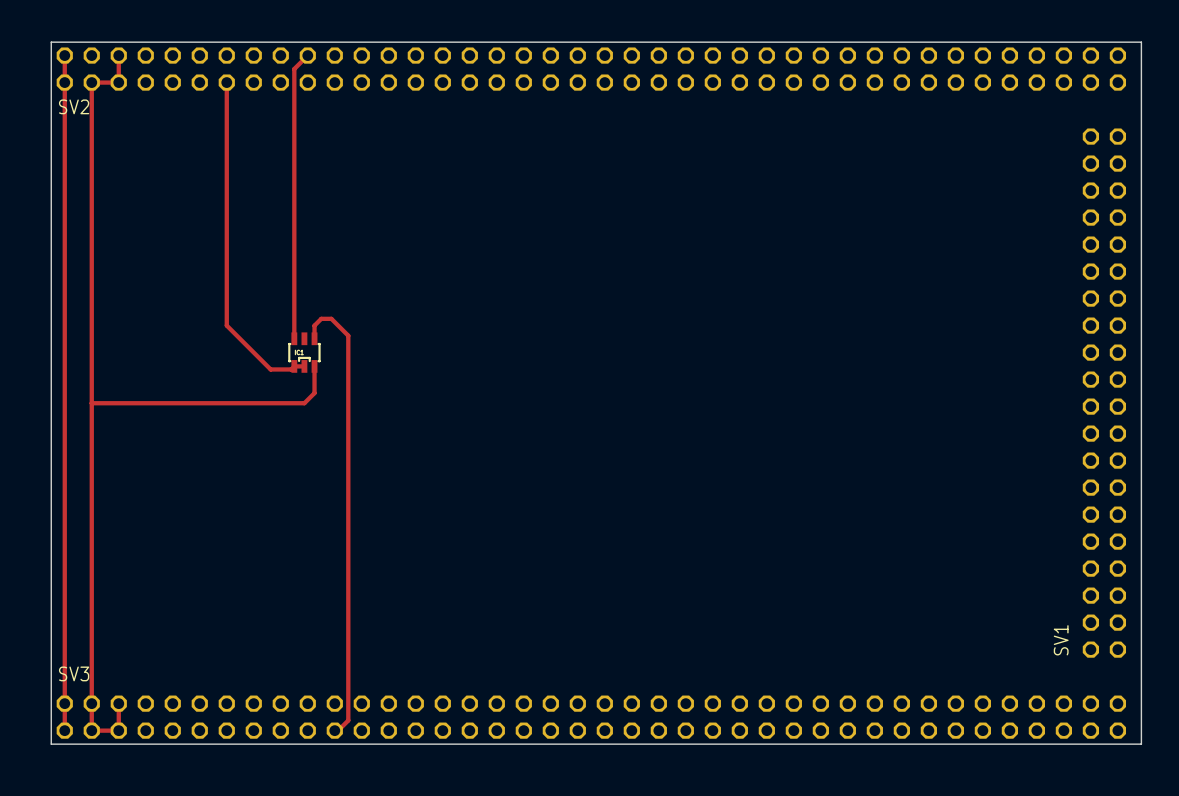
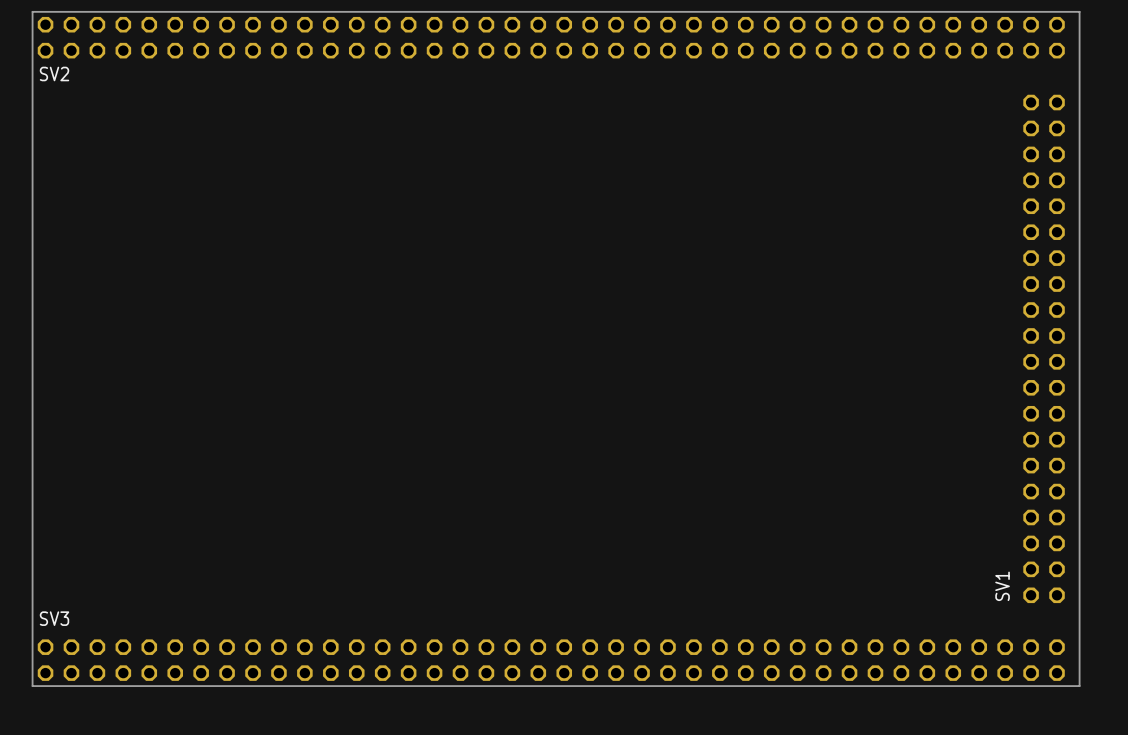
track: (64, 55) (64, 730) -> none
track: (118, 55) (118, 82) (91, 82) (91, 730) (118, 730) (118, 703) -> none
track: (307, 55) (294, 69) (294, 338) -> none
track: (226, 82) (226, 325) (270, 369) (291, 369) (294, 366) (304, 366) -> none
track: (314, 338) (314, 325) (321, 318) (331, 318) (348, 335) (348, 720) (338, 730) (334, 730) -> none
part: (304, 352) -> none
track: (314, 366) (314, 393) (304, 403) (91, 403) -> none

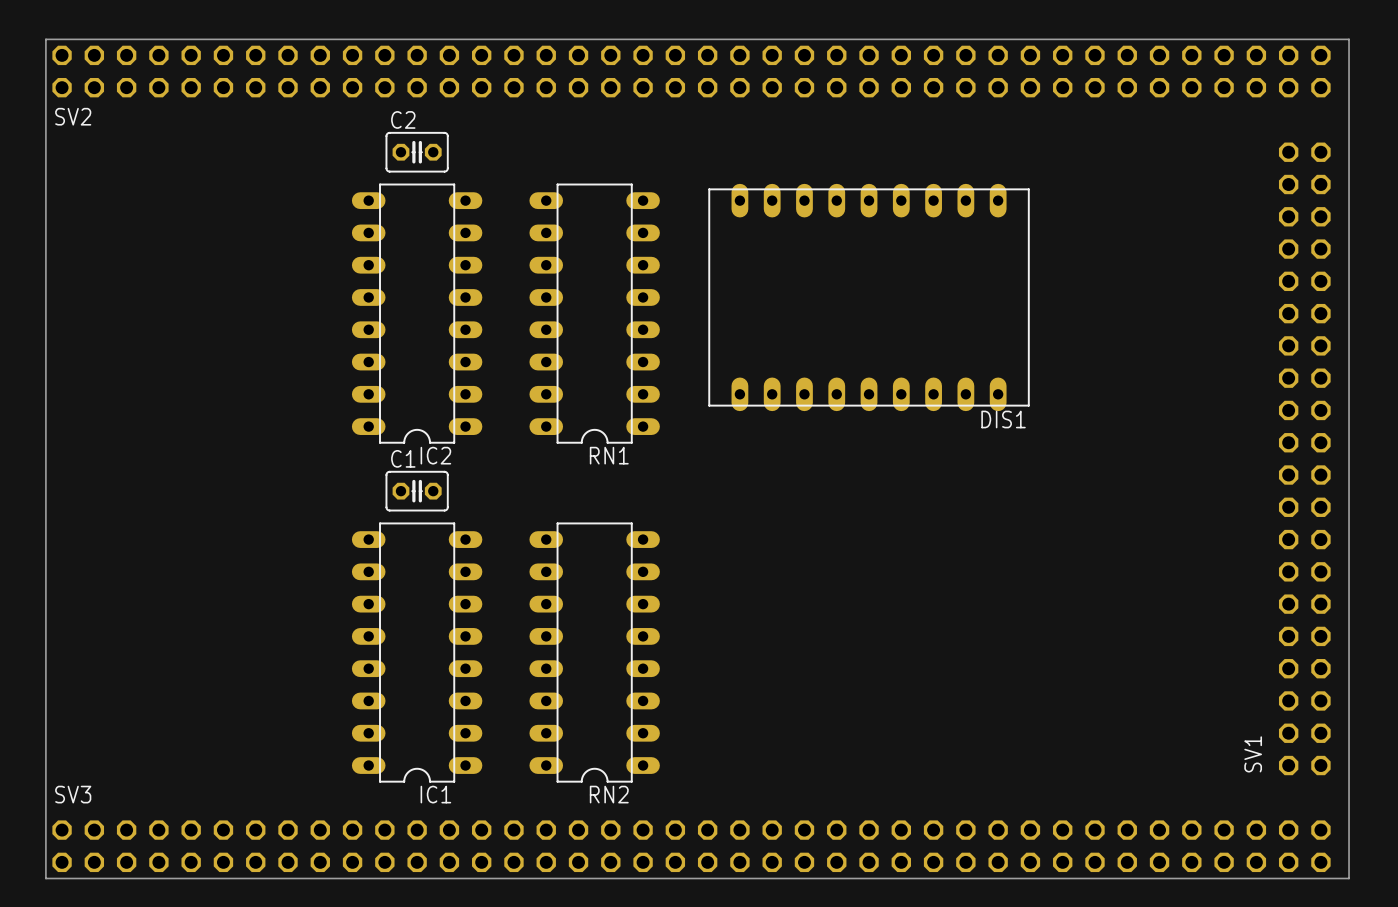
C2: none -> (417, 152)
DIS1: none -> (869, 297)
IC2: none -> (417, 313)
RN1: none -> (594, 313)
C1: none -> (417, 491)
IC1: none -> (417, 652)
RN2: none -> (594, 652)

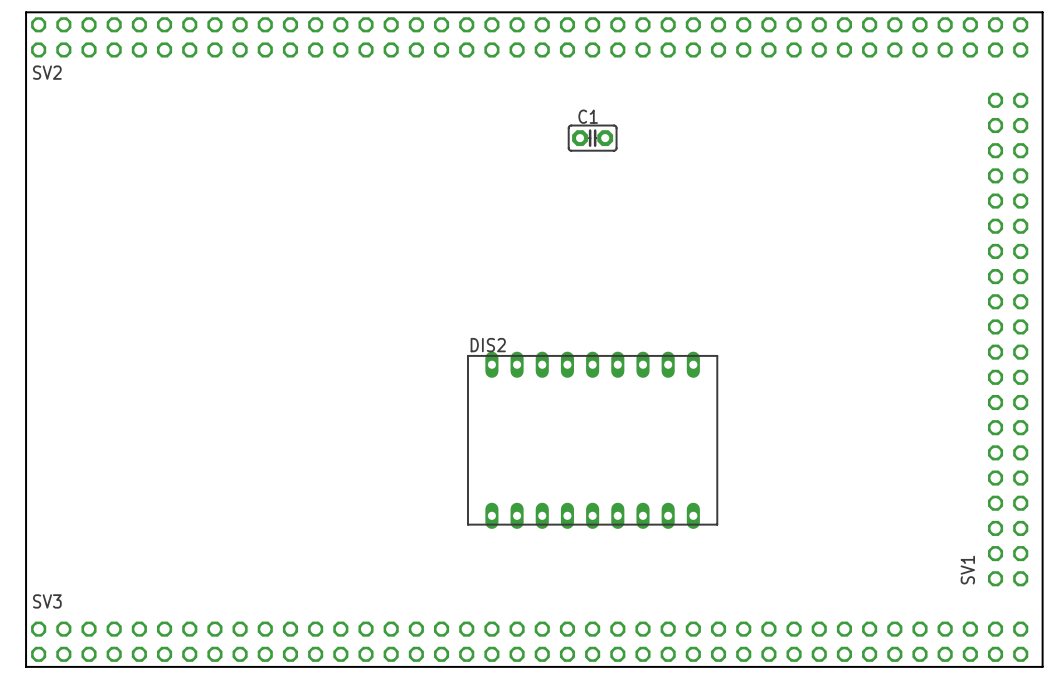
C2: (417, 152) -> none
DIS1: (869, 297) -> none
IC2: (417, 313) -> none
RN1: (594, 313) -> none
C1 footprint: [385, 470, 449, 512] -> [567, 124, 618, 152]
DIS2: none -> (592, 440)
IC1: (417, 652) -> none
RN2: (594, 652) -> none

